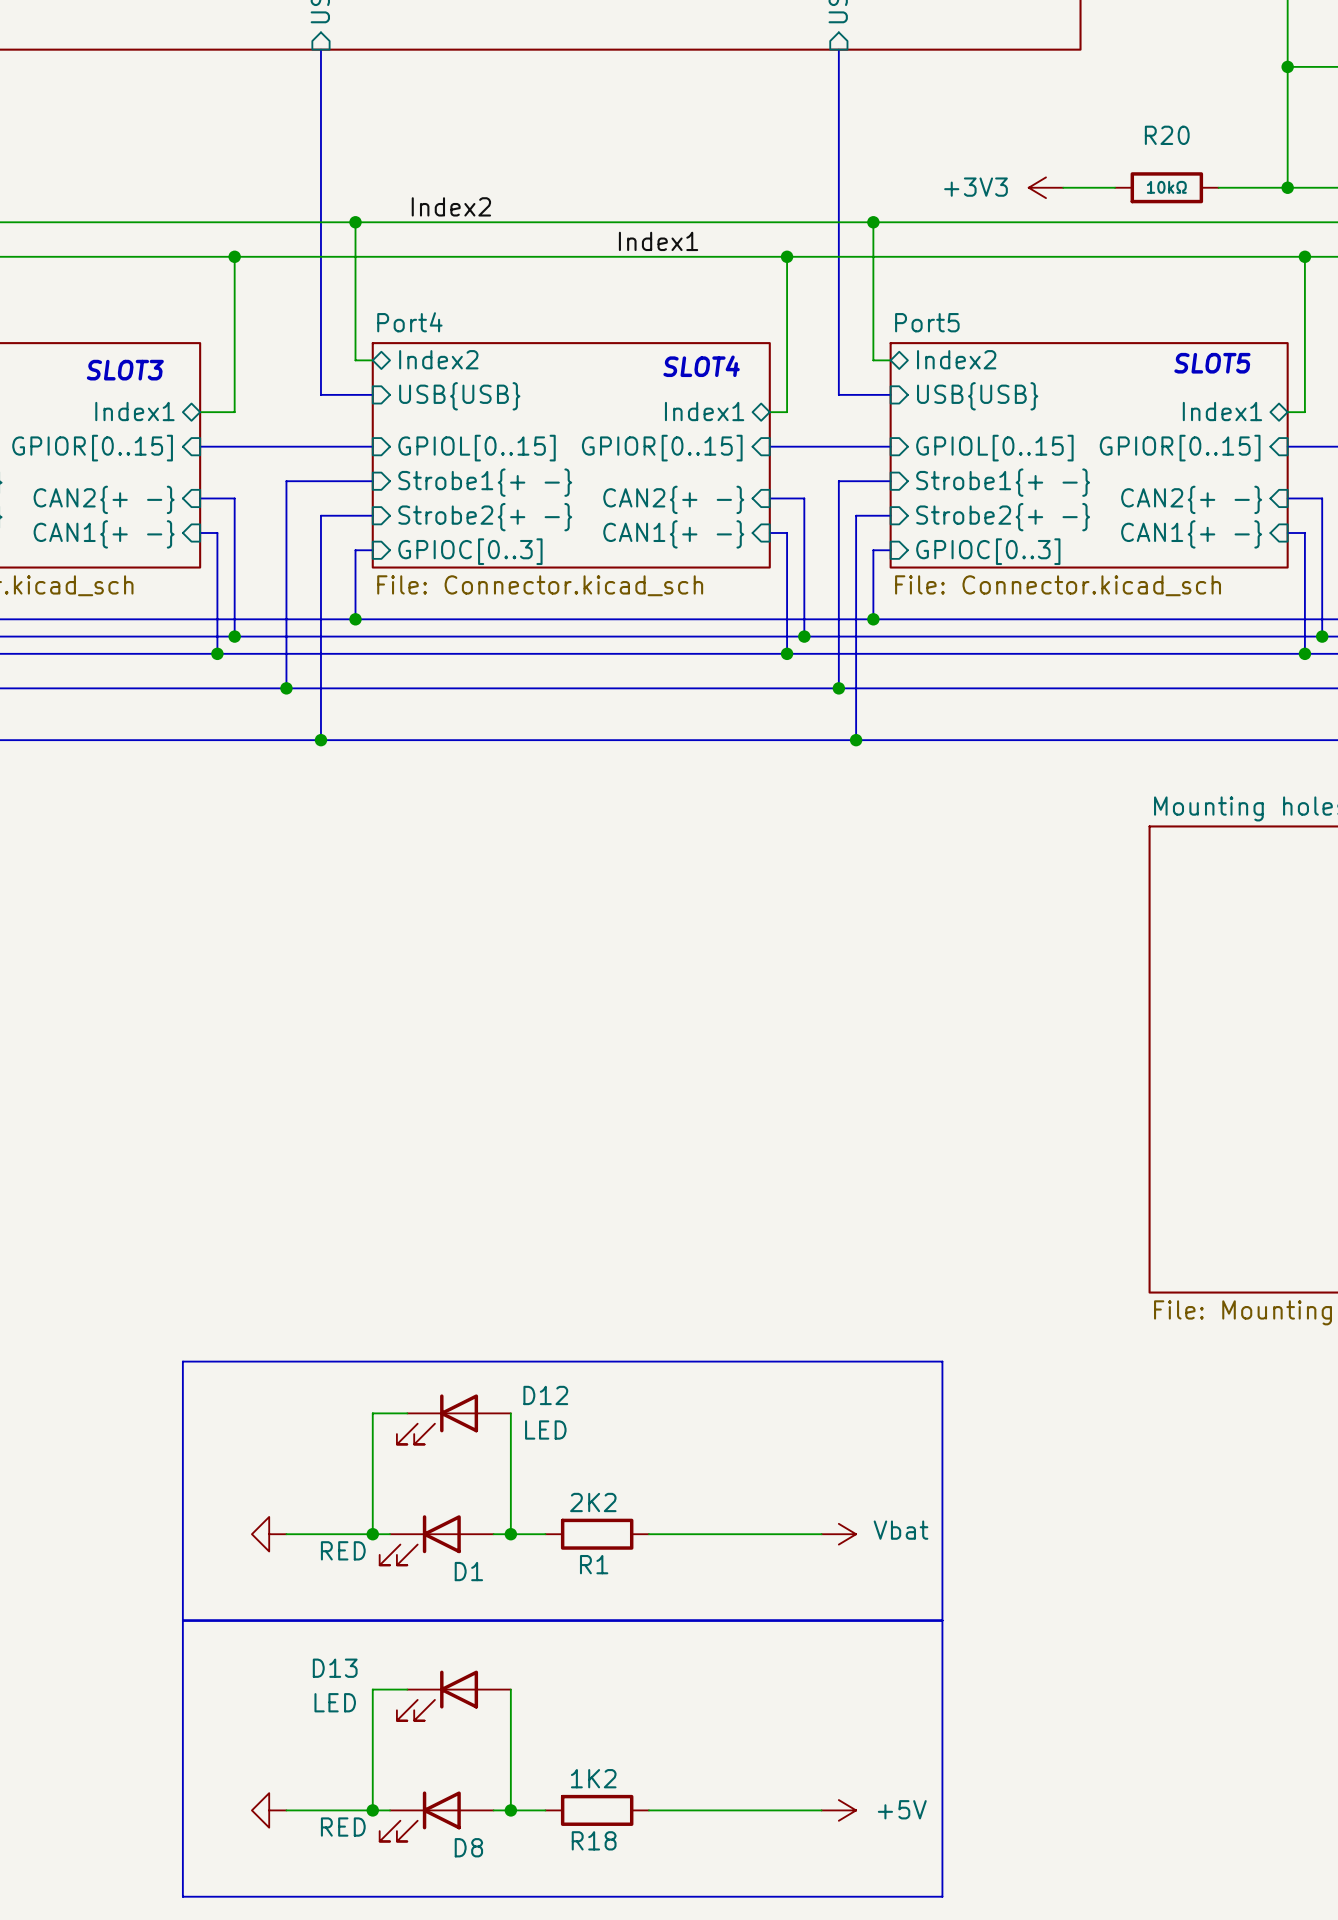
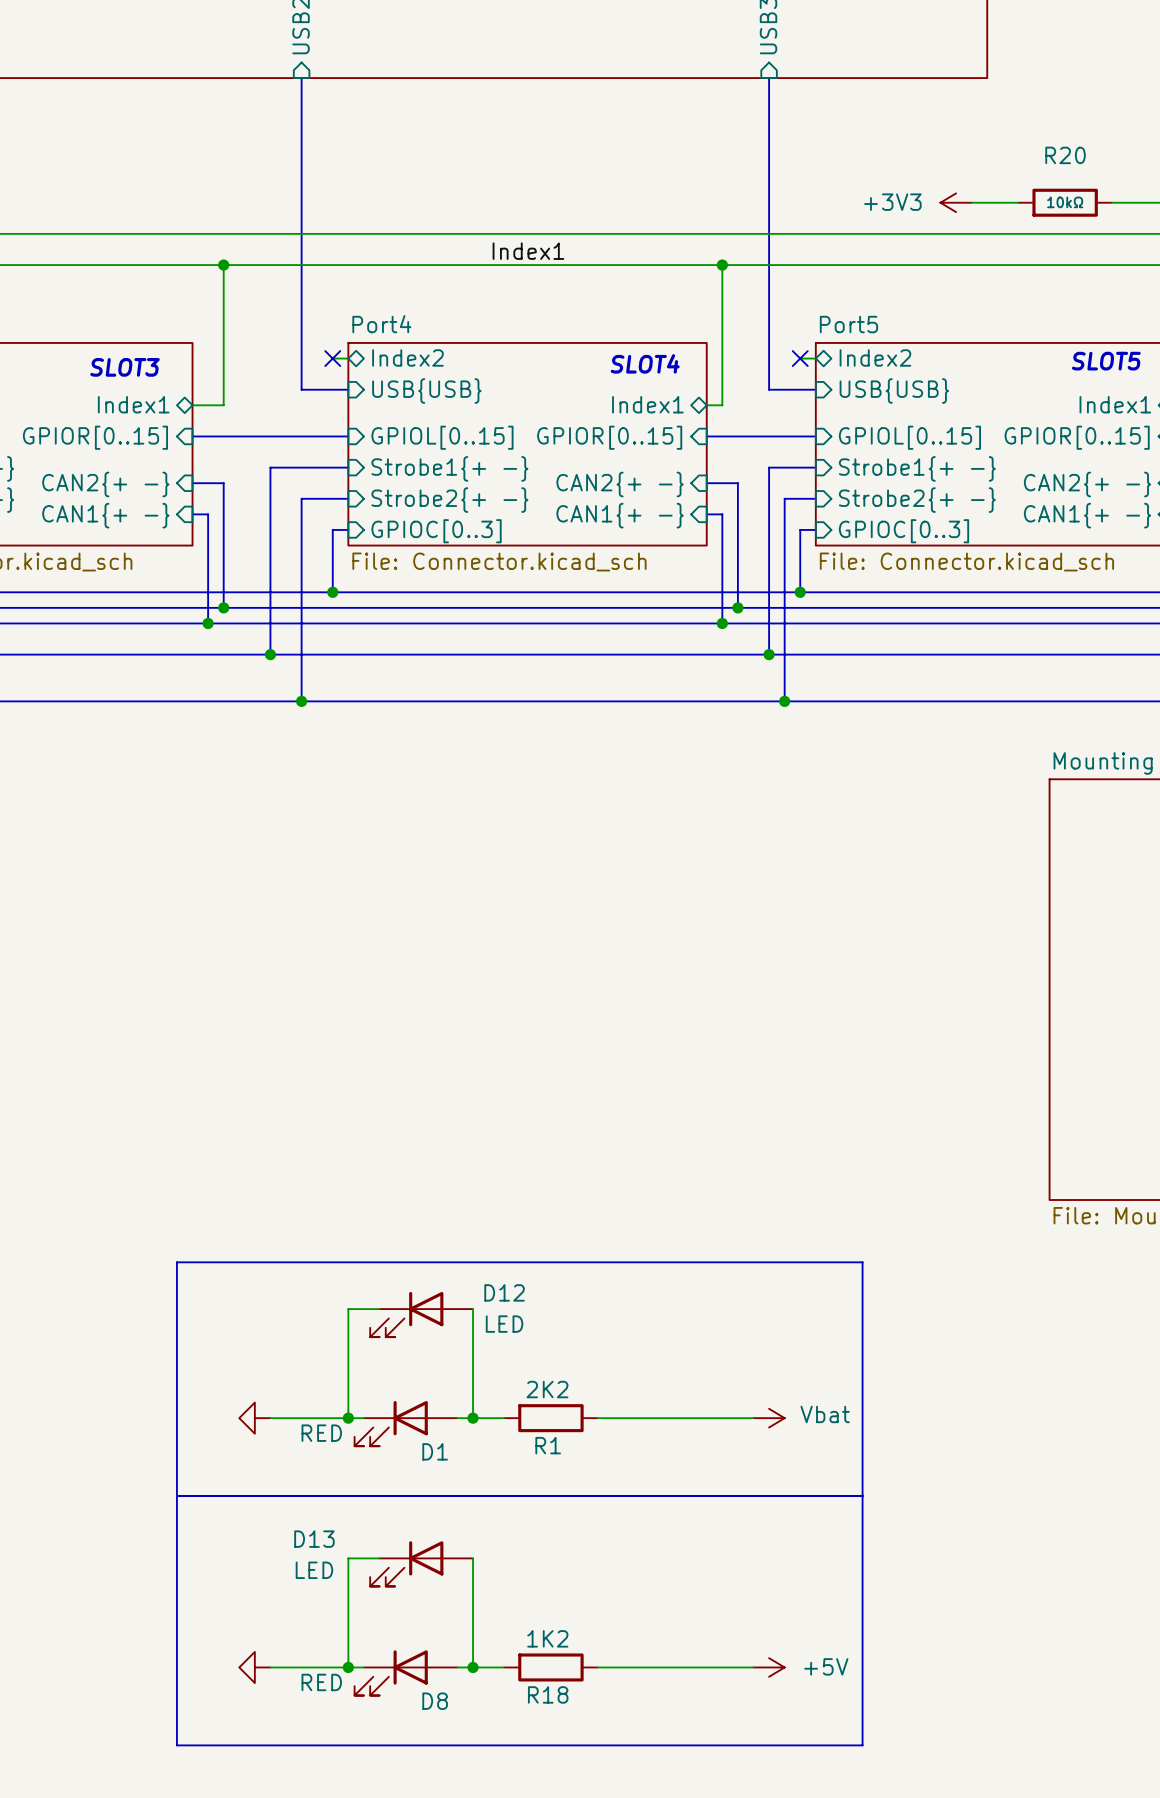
label: Index2 (451, 206) -> none
wire: (355, 222) (355, 360) -> none
junction: (355, 222) -> none
wire: (873, 222) (873, 360) -> none
junction: (873, 222) -> none
label position: Index1 (658, 241) -> Index1 (528, 251)
no-connect mark: none -> (332, 358)
no-connect mark: none -> (800, 358)

